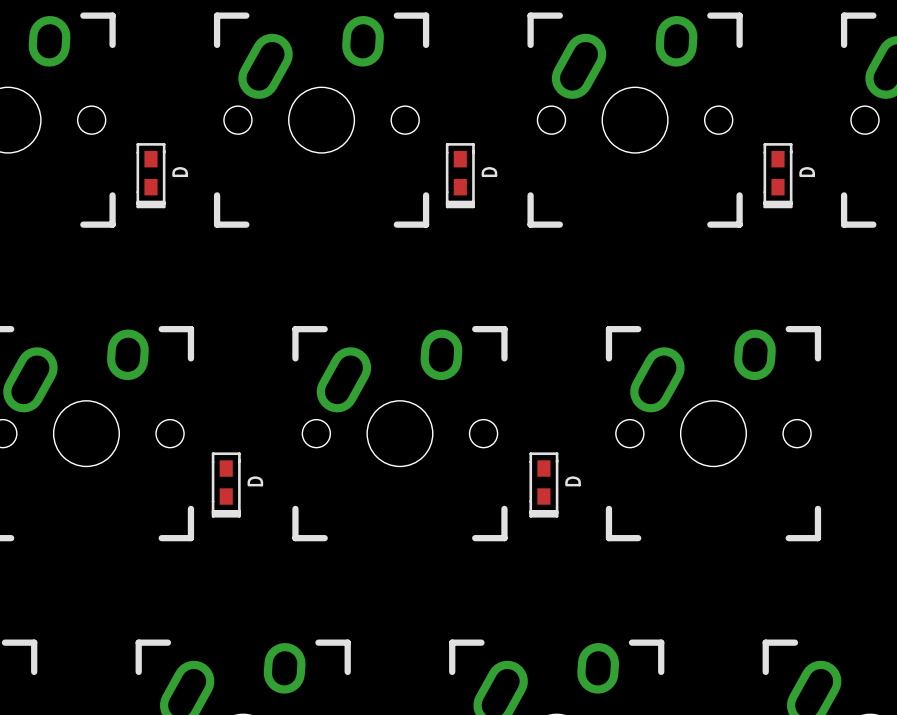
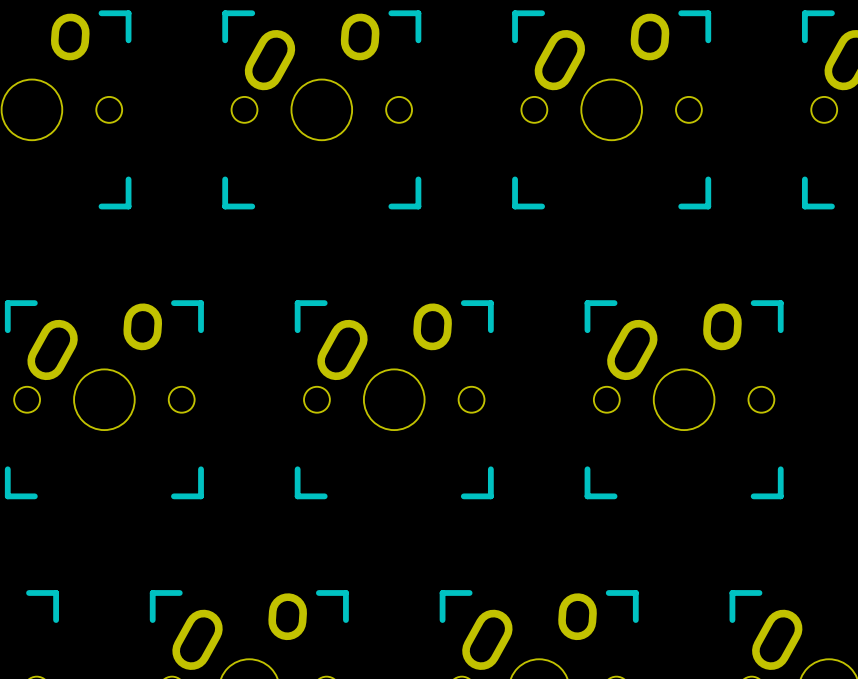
part: D (150, 175) -> none
part: D (460, 175) -> none
part: D (778, 175) -> none
part: D (226, 484) -> none
part: D (543, 484) -> none

